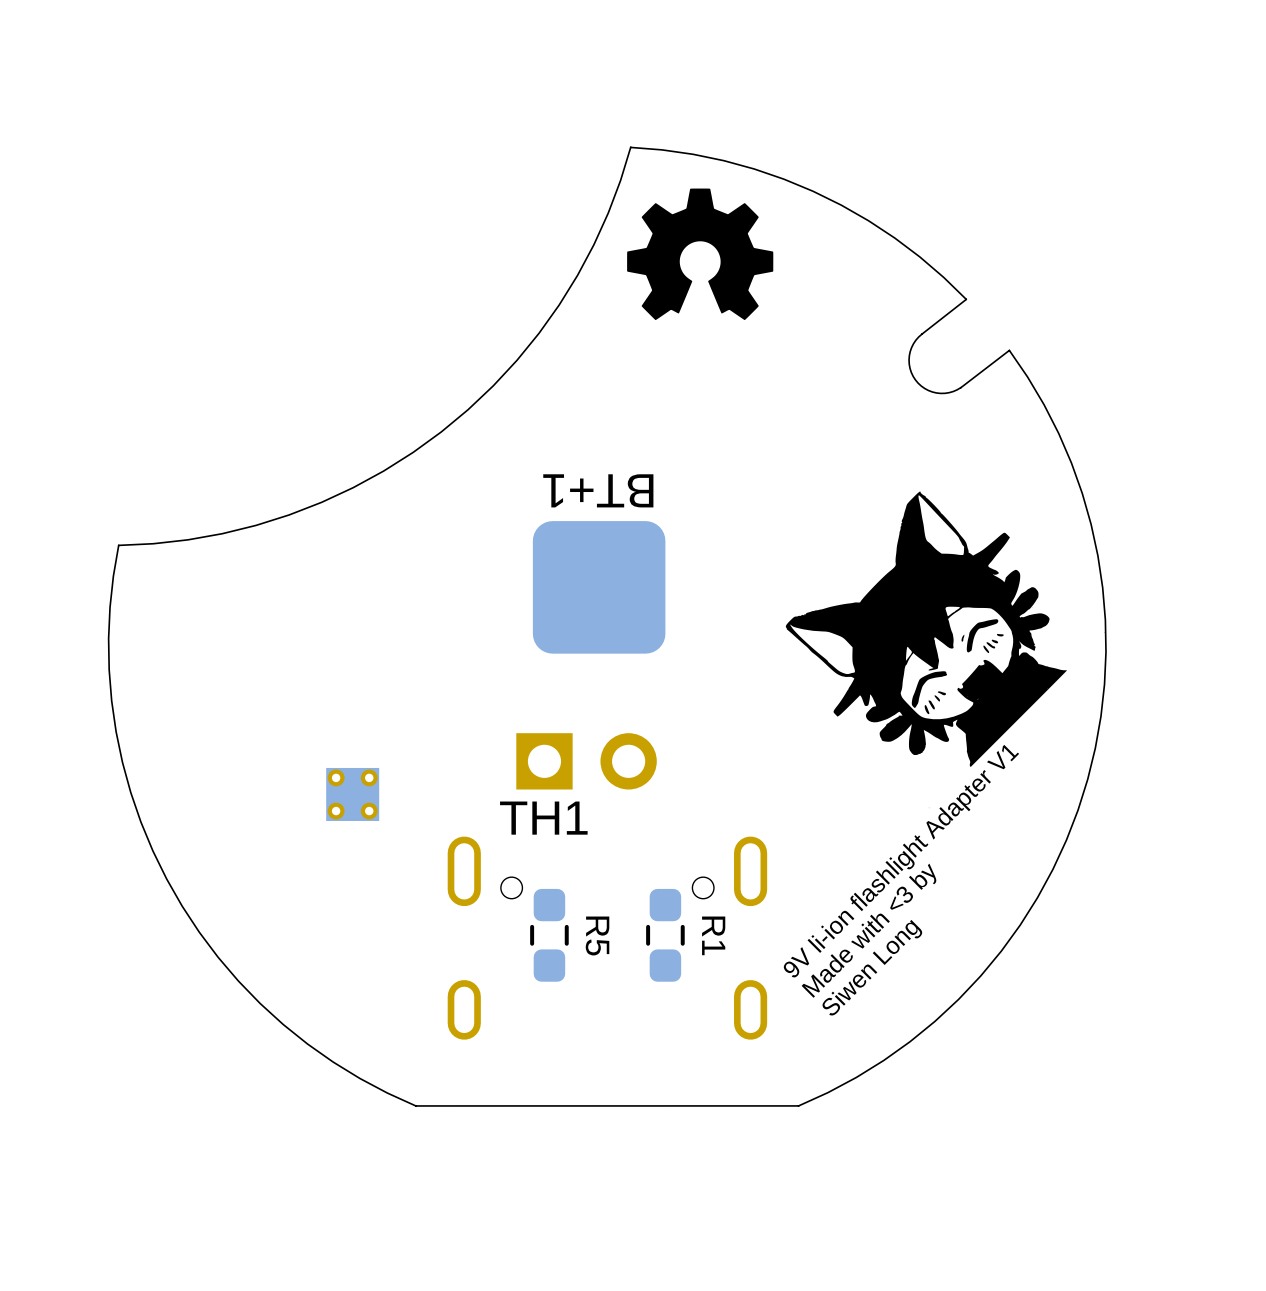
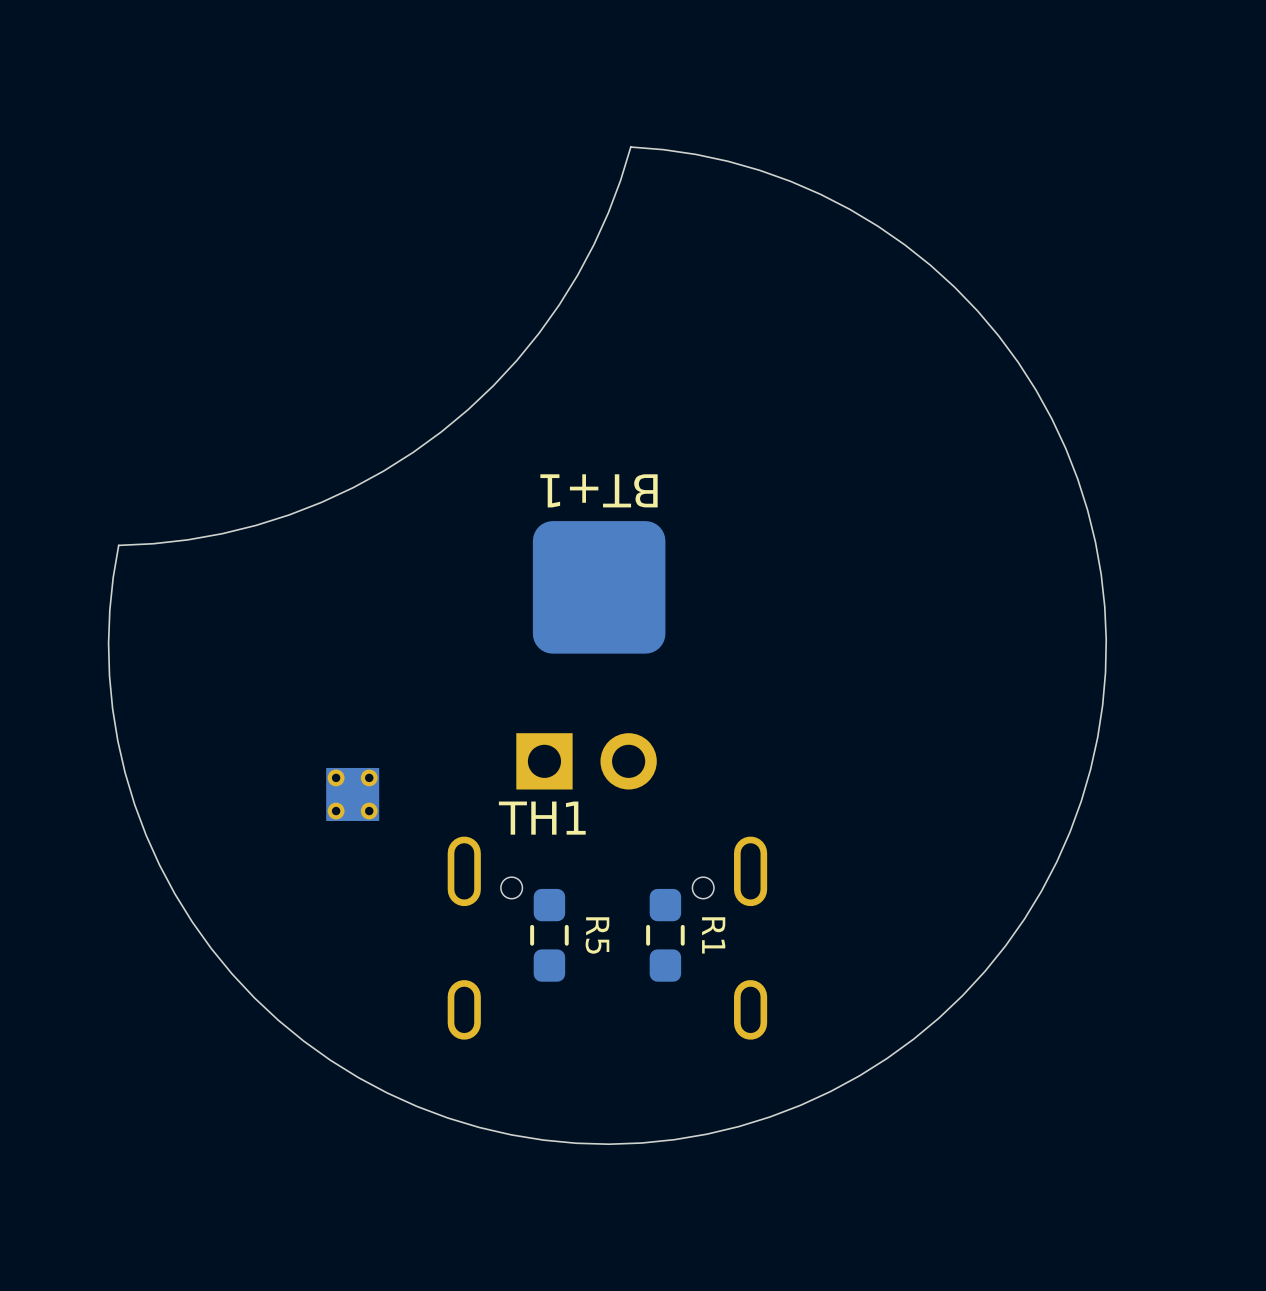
board edge: (630, 147) (693, 154) (723, 160) (784, 179) (841, 205) (894, 238) (919, 257) (966, 299) (921, 334) (913, 343) (909, 359) (910, 368) (915, 379) (921, 386) (932, 392) (940, 393) (953, 391) (1009, 350) (1044, 404) (1058, 433) (1082, 493) (1091, 524) (1102, 587) (1105, 652) (1100, 716) (1095, 748) (1078, 810) (1066, 840) (1037, 897) (1001, 951) (958, 999) (910, 1041) (856, 1077) (798, 1105) (415, 1105) (359, 1078) (333, 1062) (283, 1024) (260, 1003) (218, 957) (182, 906) (152, 850) (130, 792) (122, 762) (111, 700) (109, 669) (110, 607) (118, 545) -> (630, 147) (695, 154) (728, 161) (790, 181) (849, 209) (904, 244) (954, 287) (977, 310) (1018, 362) (1051, 418) (1077, 478) (1087, 510) (1101, 574) (1106, 639) (1102, 705) (1097, 737) (1081, 801) (1070, 832) (1041, 891) (1005, 945) (962, 995) (913, 1039) (859, 1075) (830, 1091) (770, 1116) (706, 1134) (674, 1139) (609, 1144) (543, 1140) (479, 1127) (417, 1106) (358, 1077) (330, 1060) (278, 1020) (232, 973) (192, 921) (159, 865) (146, 835) (125, 772) (112, 708) (108, 643) (113, 577) (118, 545)
drawing: [627, 188, 774, 321] -> none
drawing: [785, 491, 1105, 809] -> none
text: 9V li-ion flashlight Adapter V1 (901, 861) -> none
text: Made with <3 by (869, 930) -> none
text: Siwen Long (873, 968) -> none

